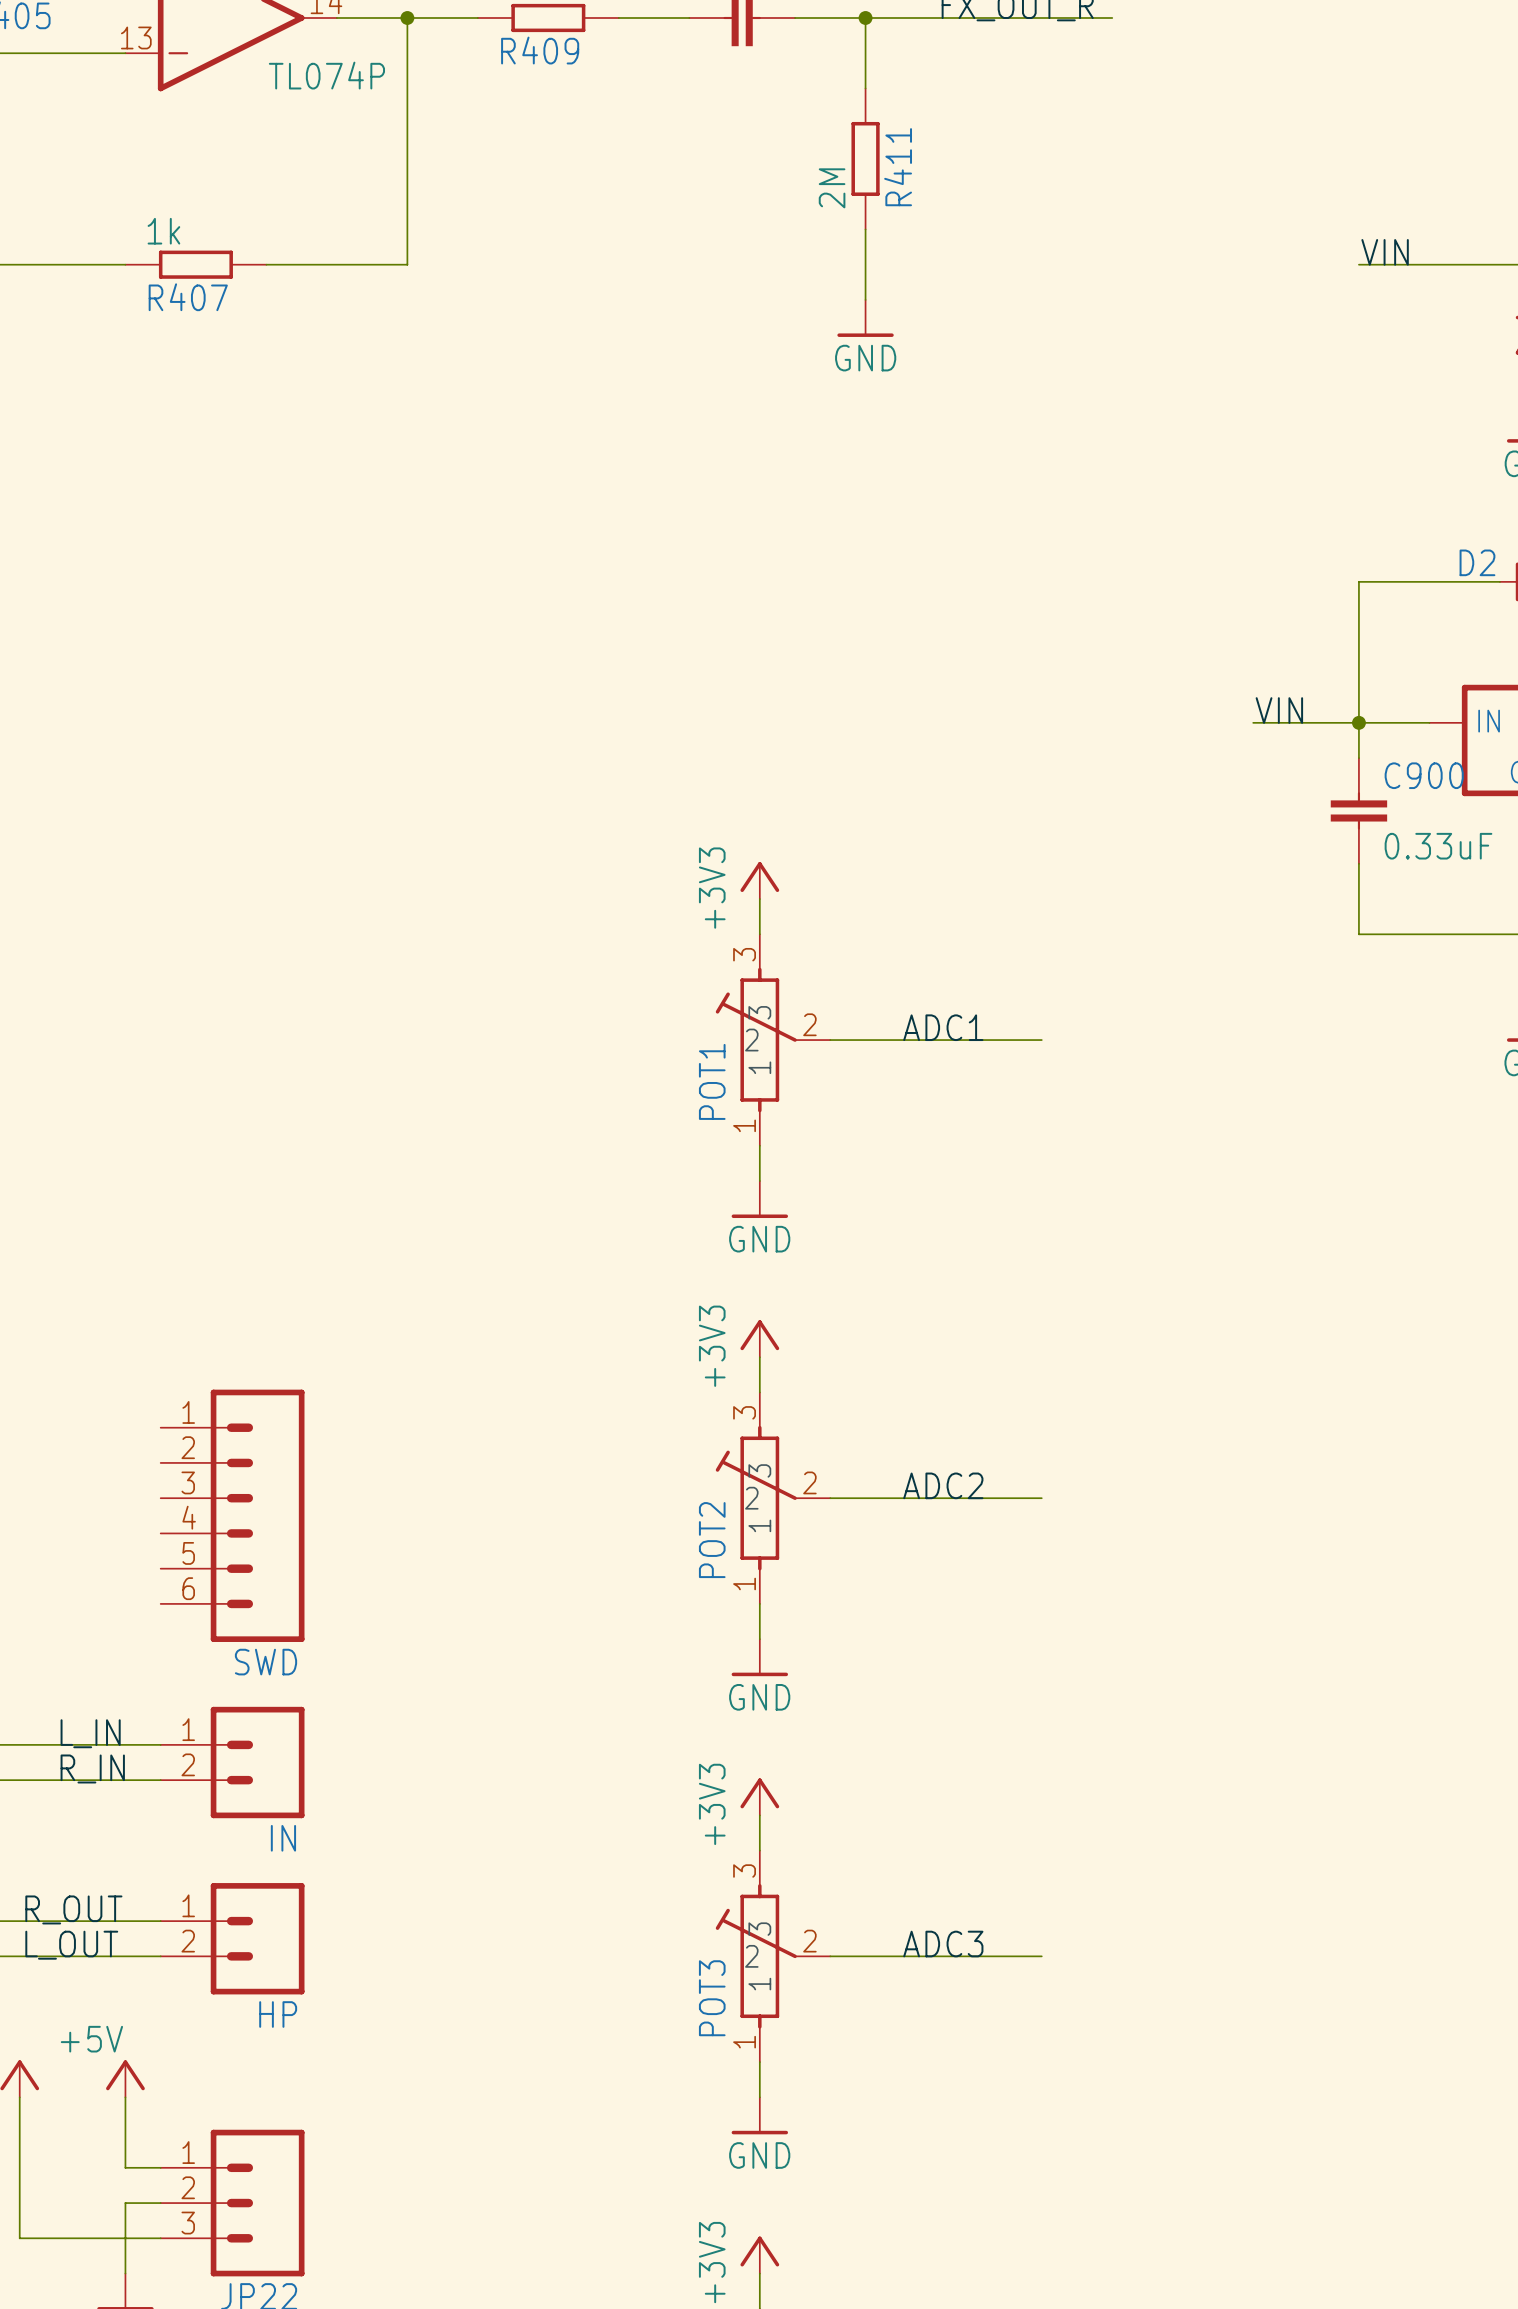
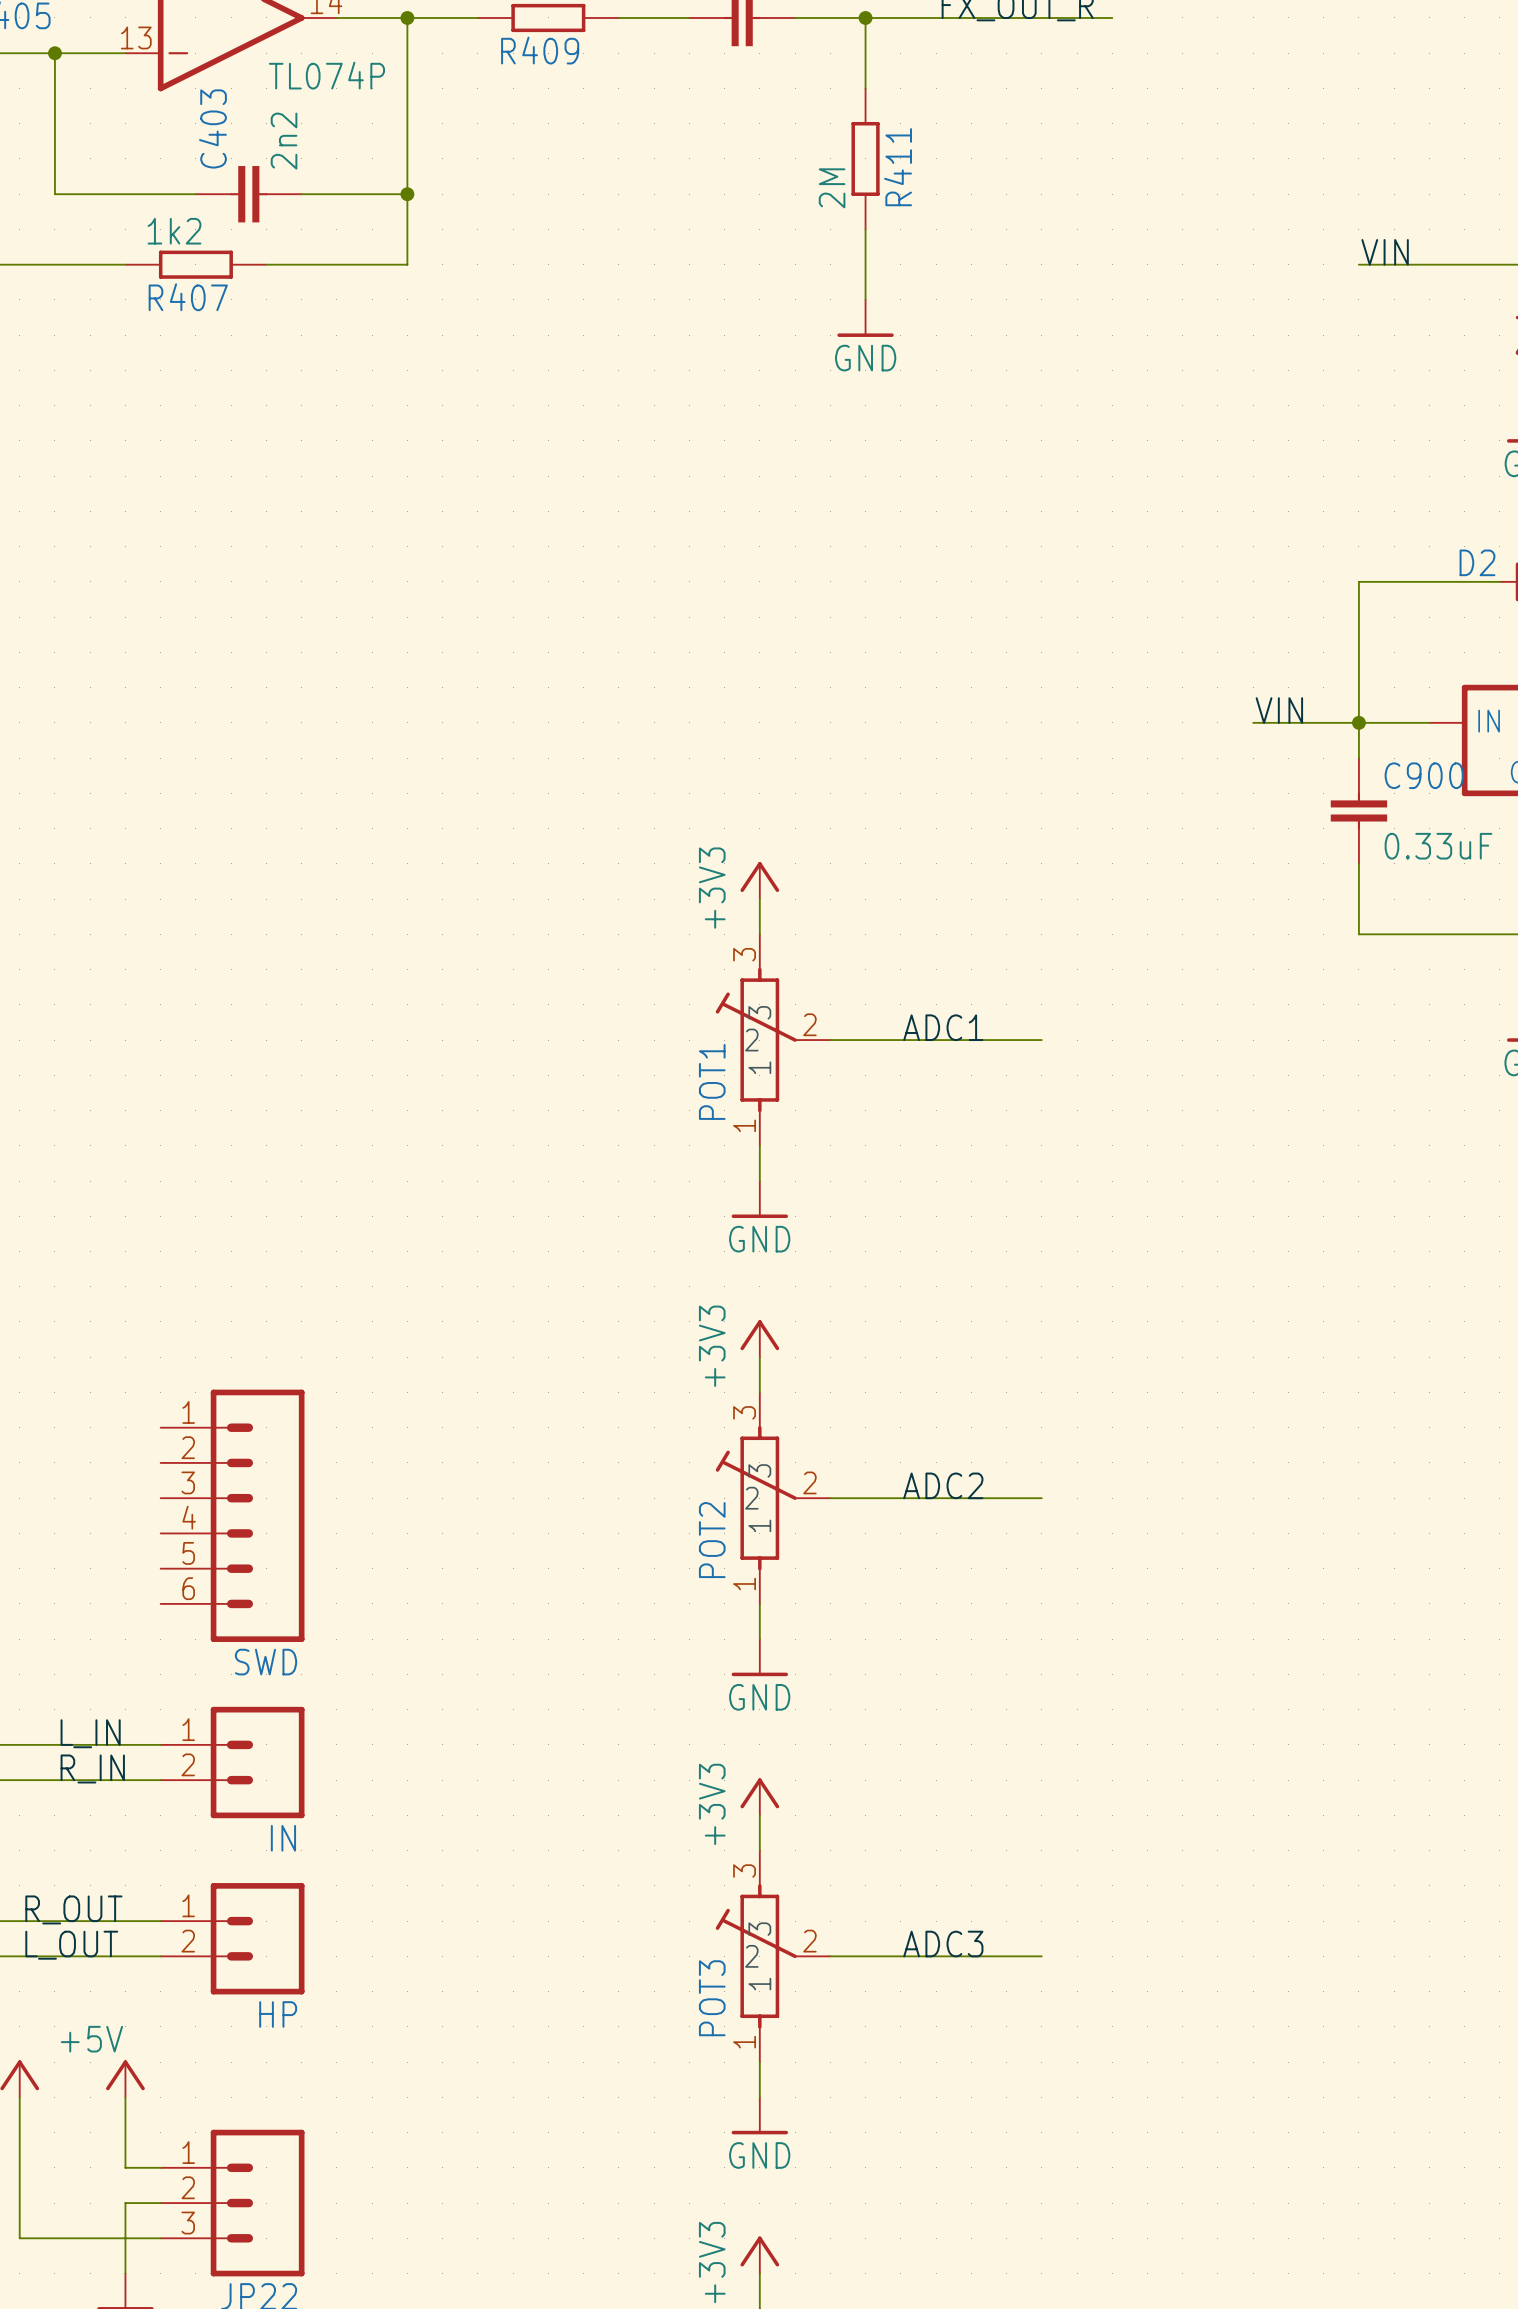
wire: none -> (54, 53) (54, 194) (195, 194)
junction: none -> (54, 53)
C403: none -> 2n2 (248, 194)
wire: none -> (301, 194) (407, 194)
junction: none -> (407, 194)
R407 value: 1k (163, 231) -> 1k2 (174, 231)

